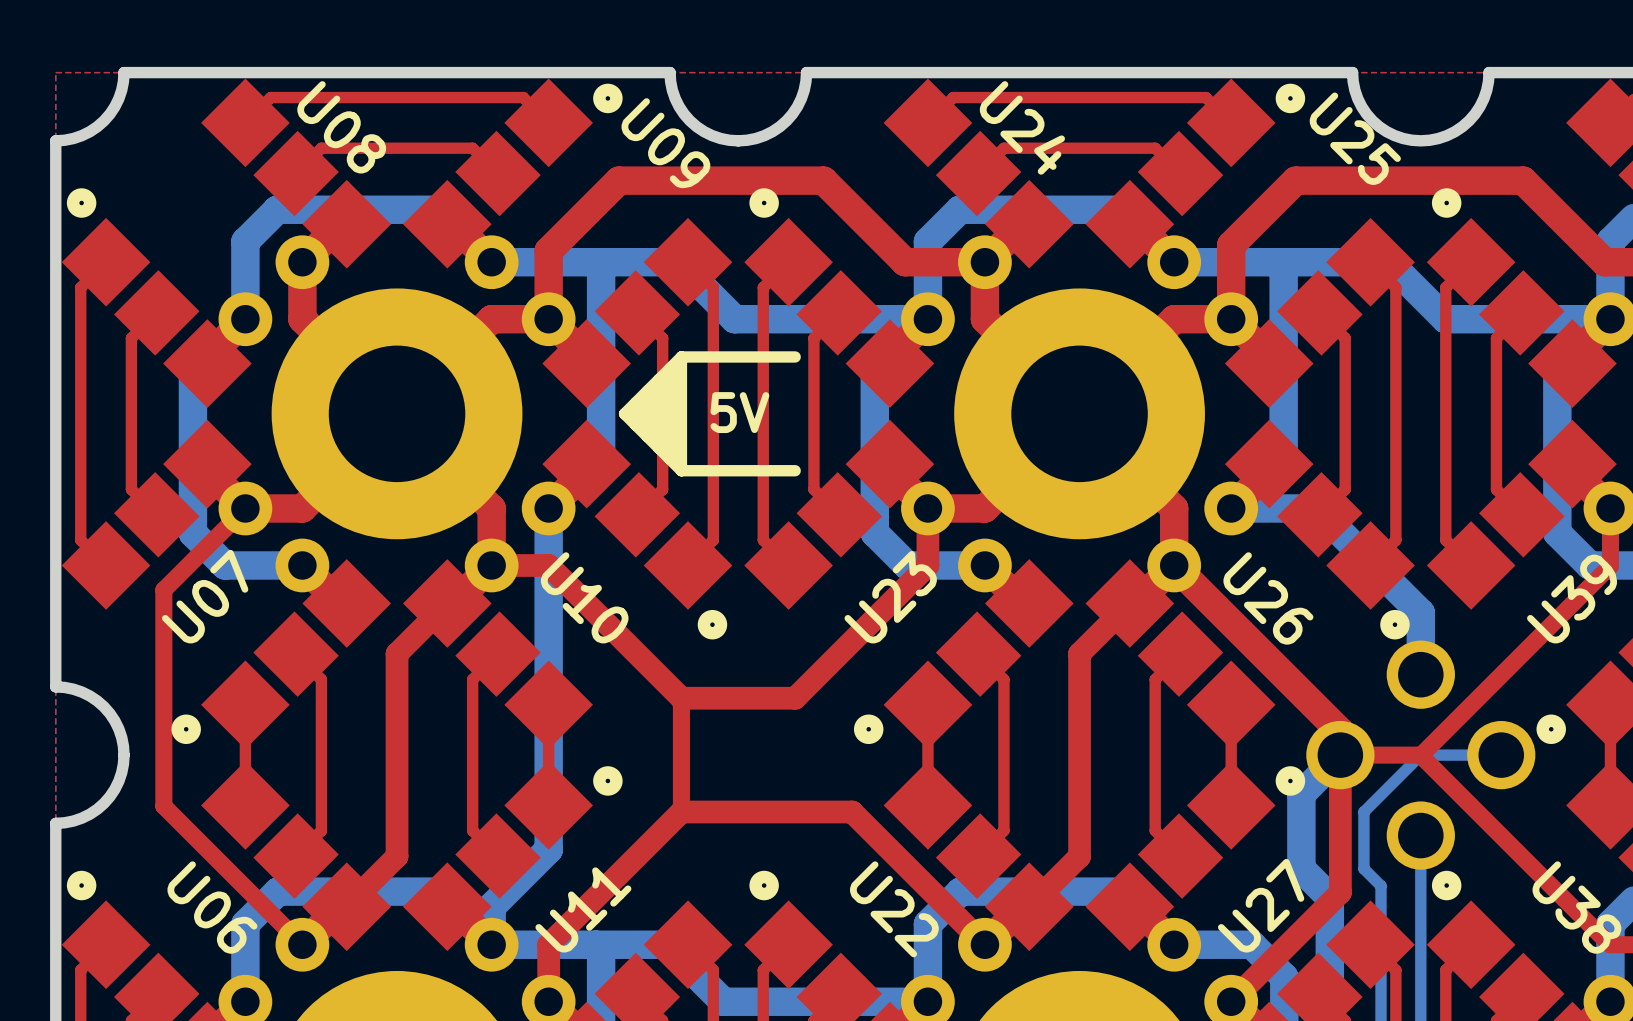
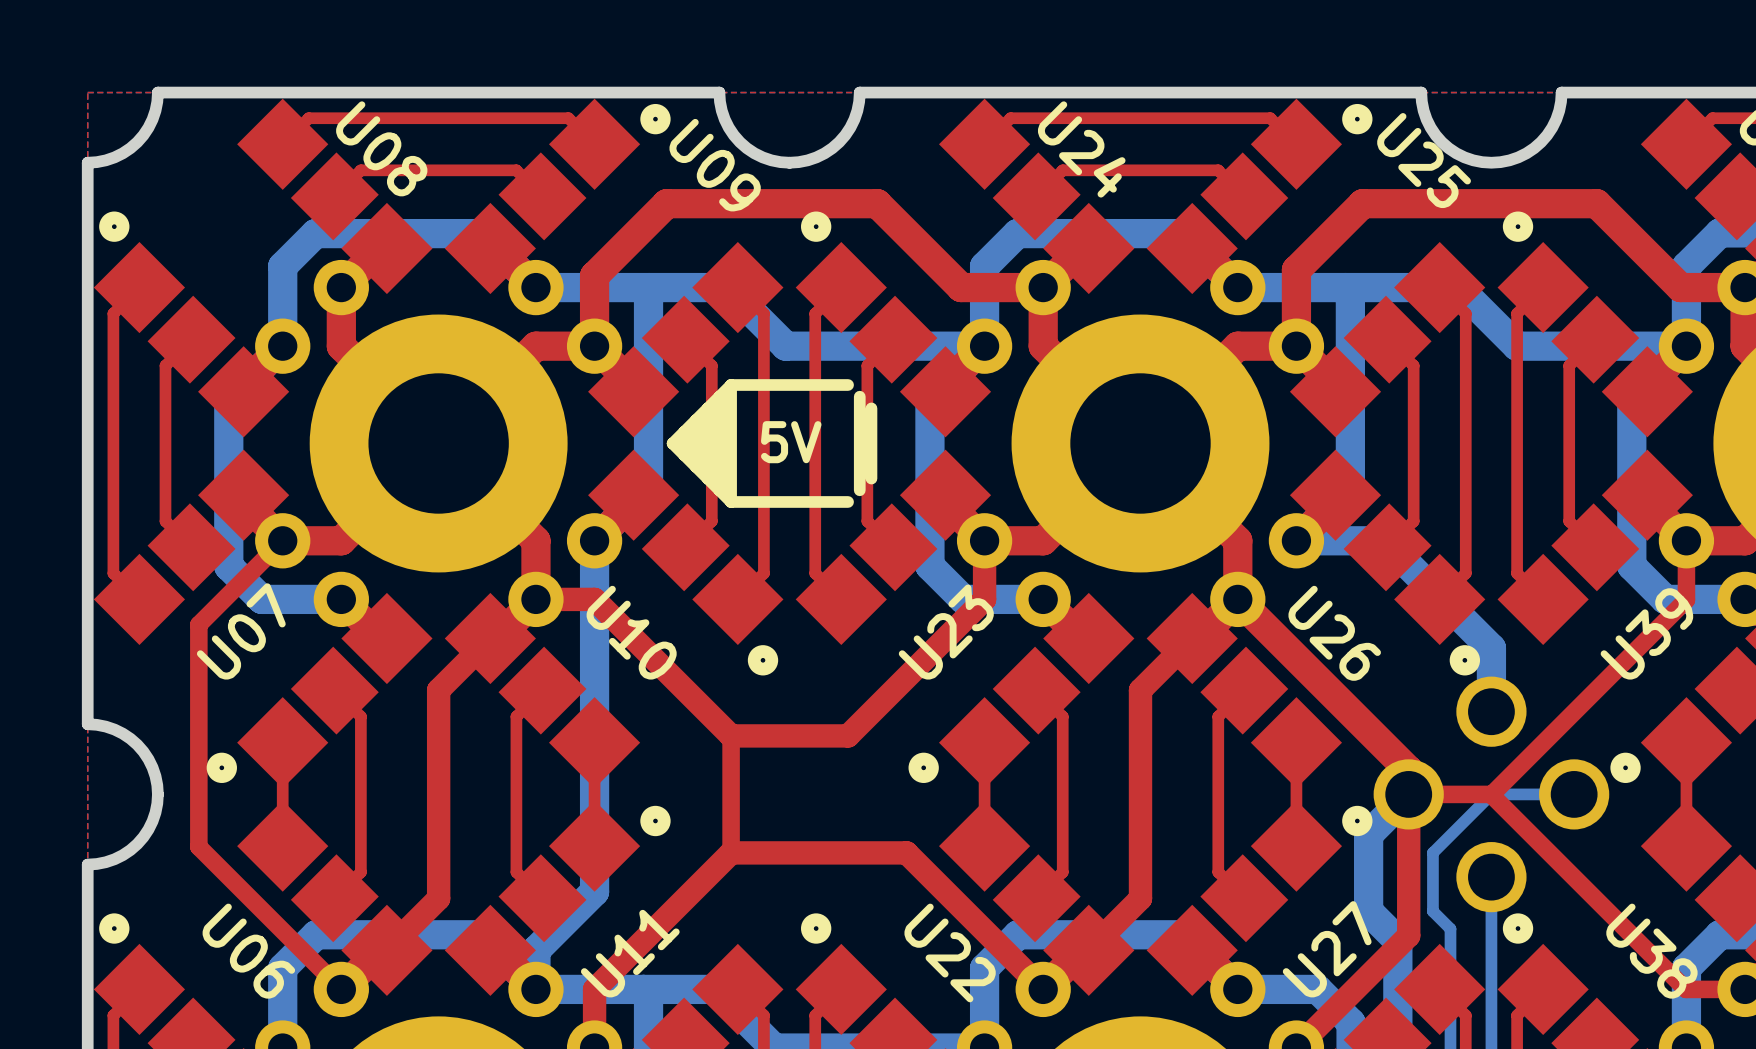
line: none -> (859, 396) (859, 490)
line: none -> (871, 408) (871, 478)

